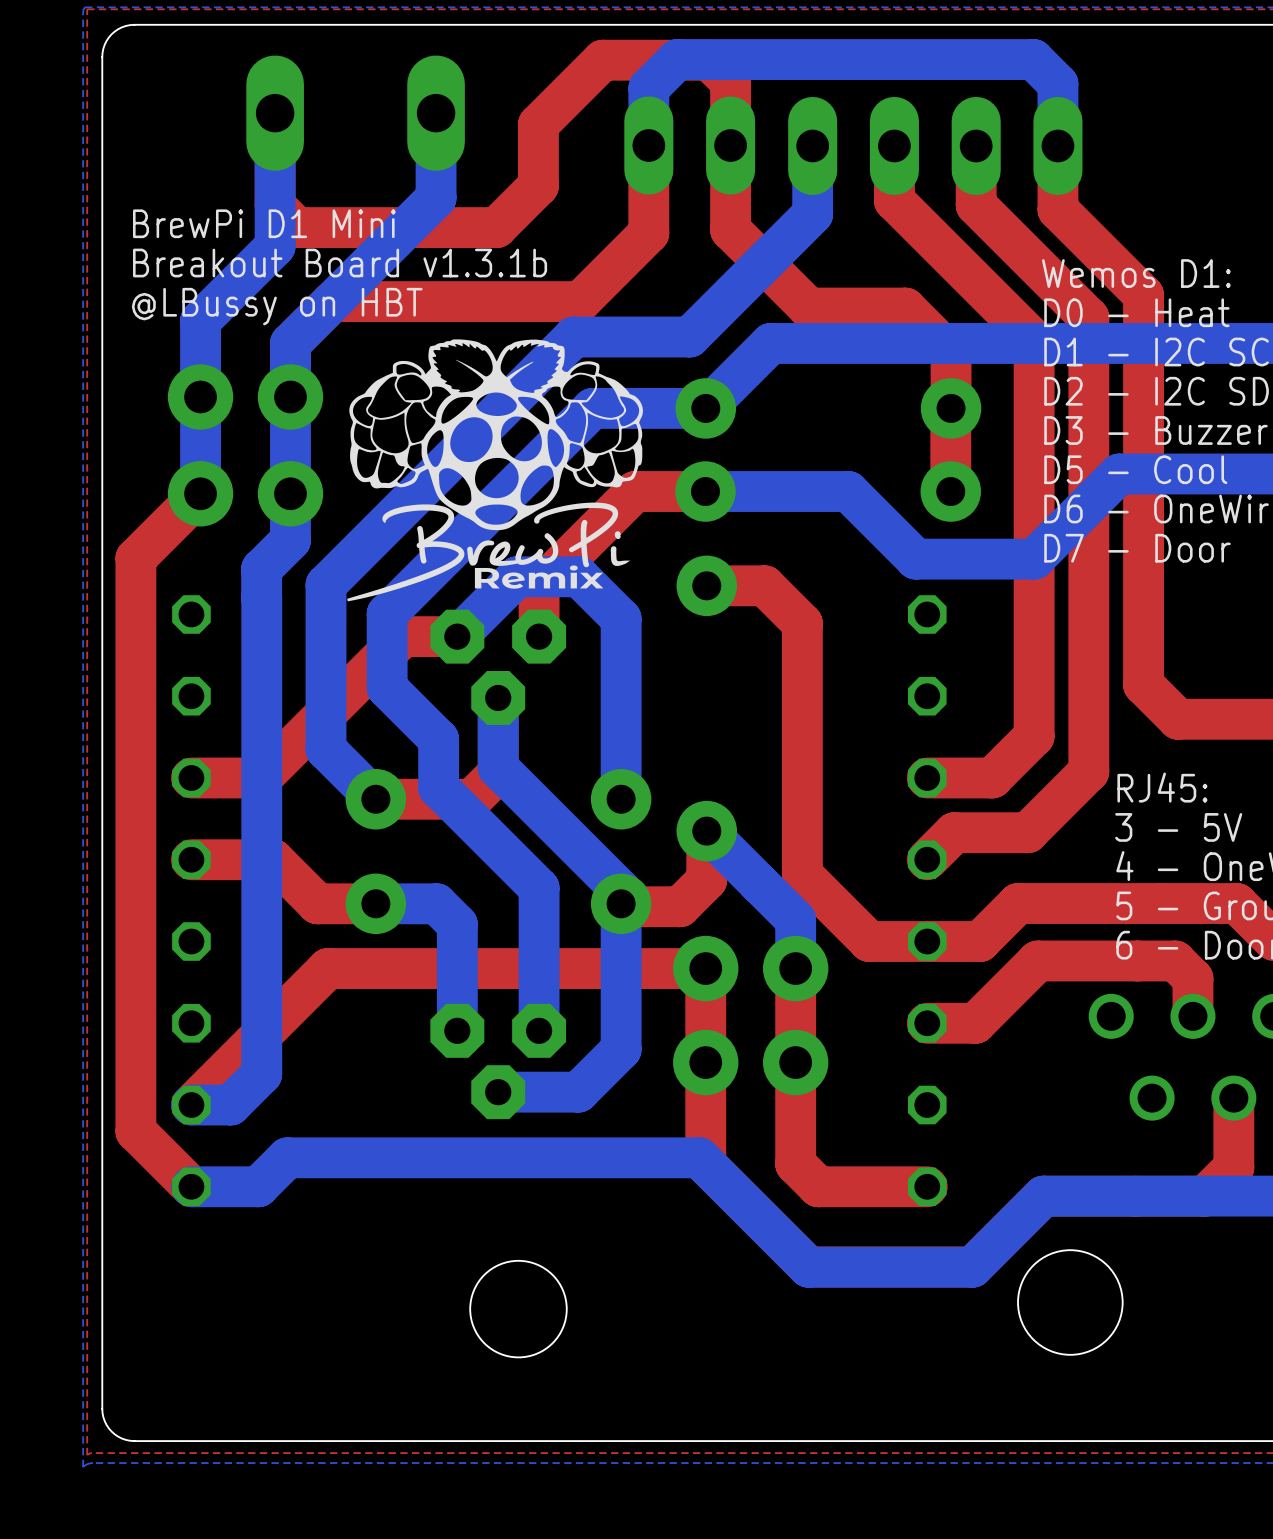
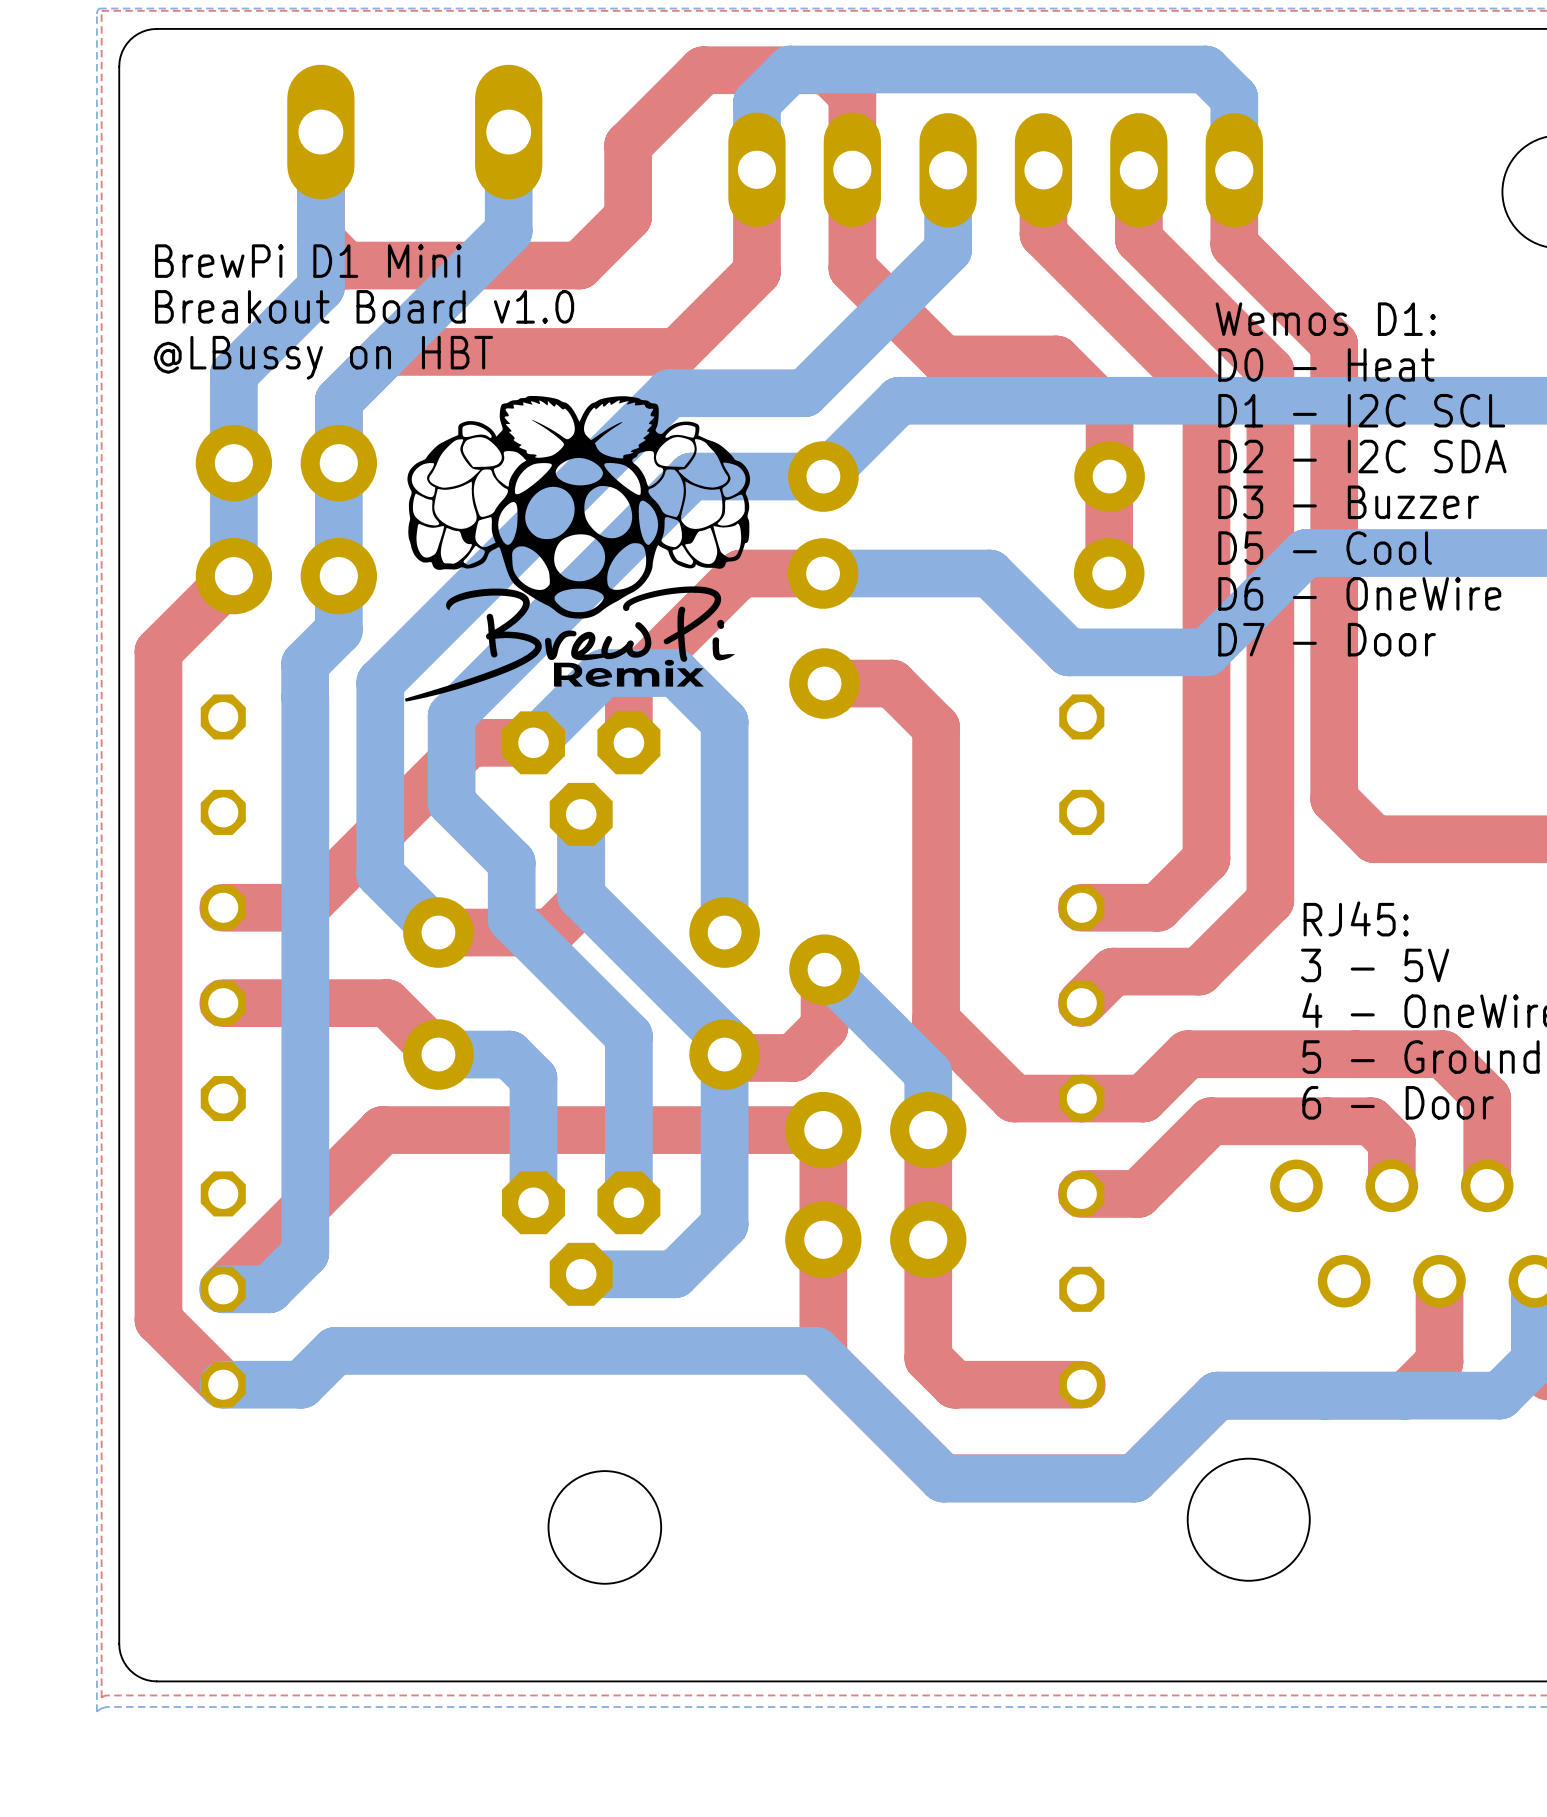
text: Breakout Board v1.3.1b (340, 263) -> Breakout Board v1.0 (364, 306)
top track: (273, 859) (317, 903) (375, 903) -> (319, 1003) (387, 1003) (438, 1054)

